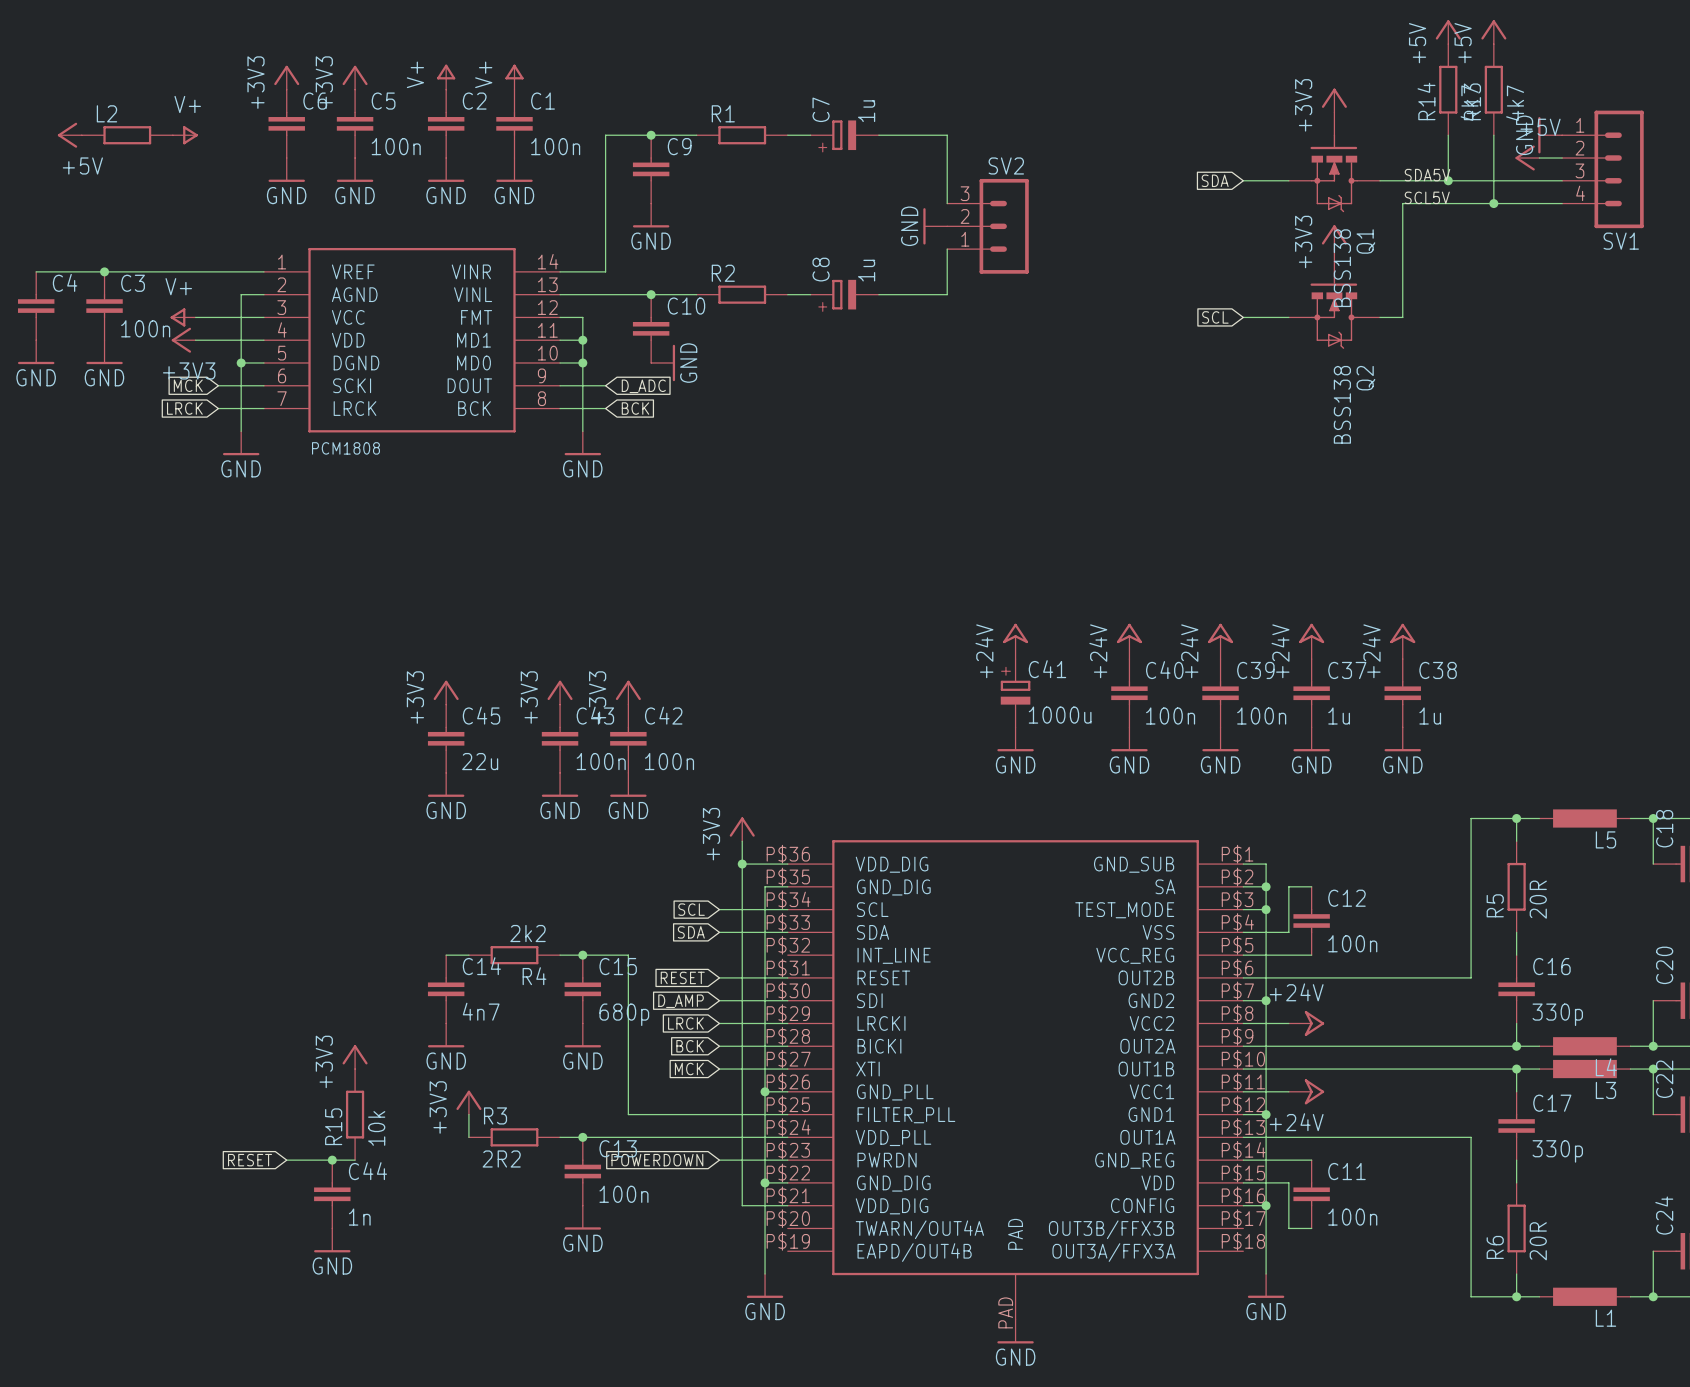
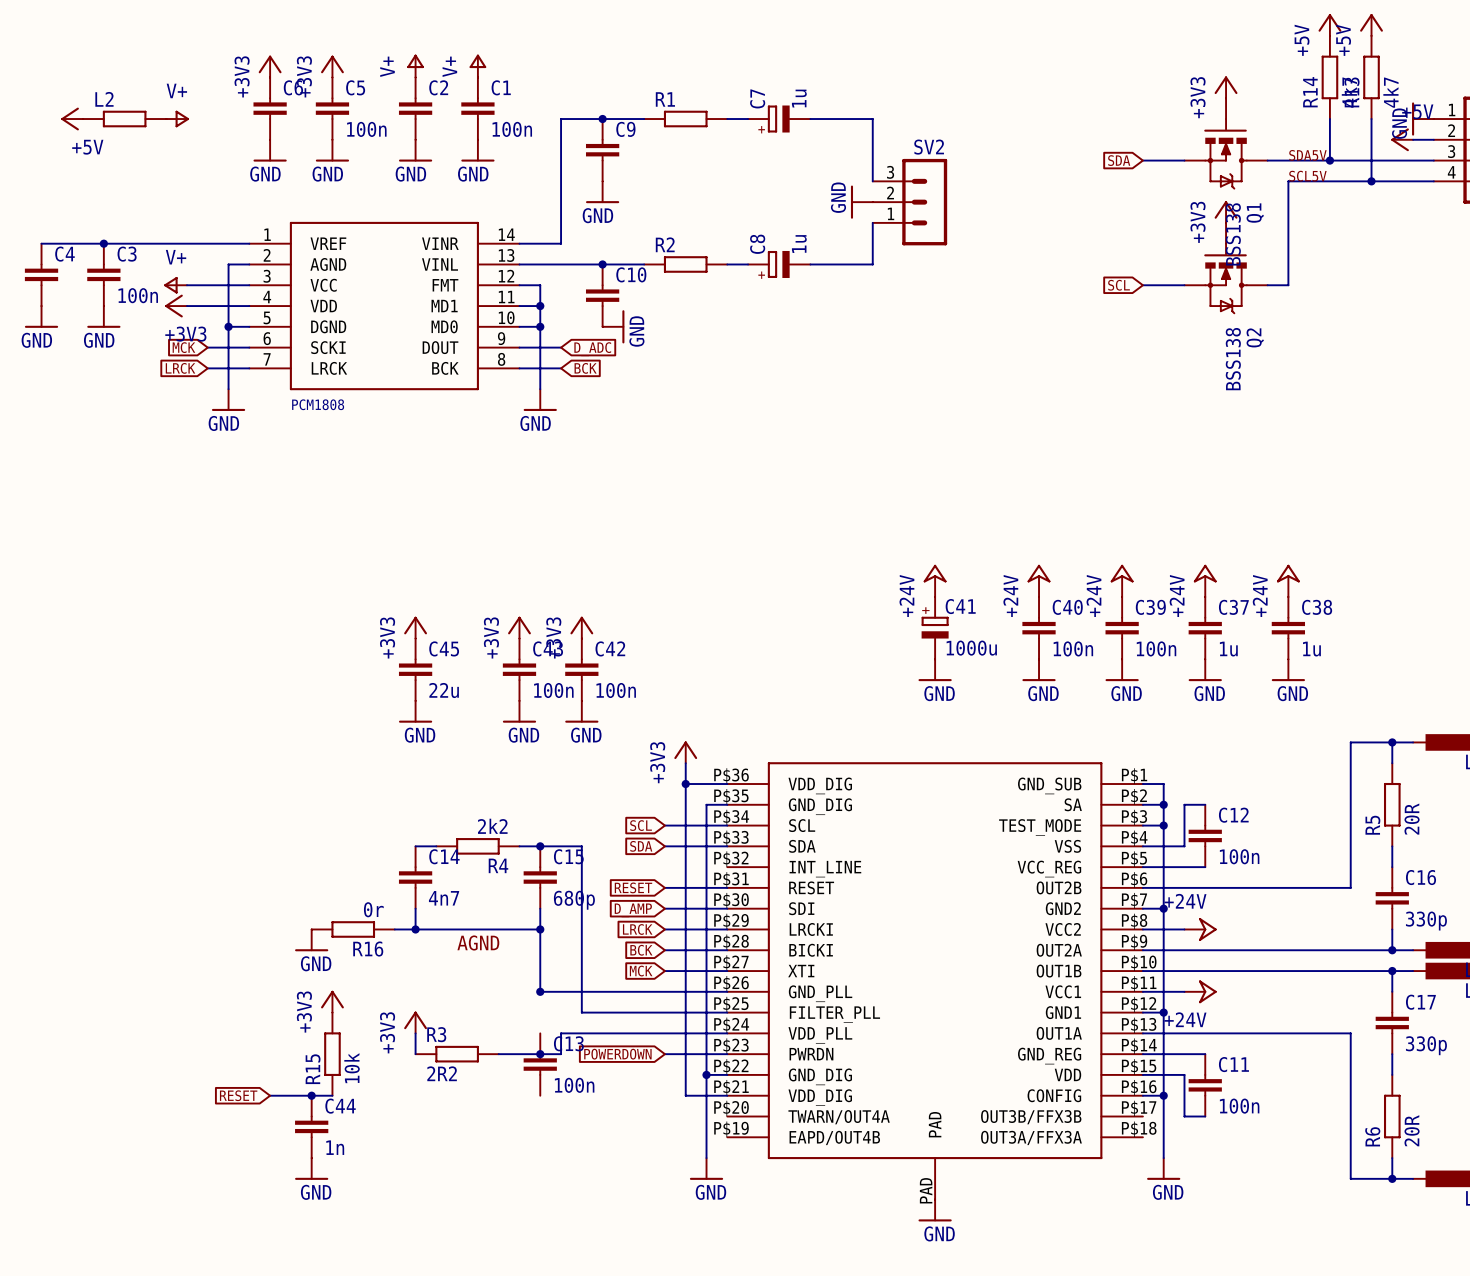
wire: (446, 955) (468, 955) -> (415, 846) (436, 846)
R4 position: (514, 955) -> (477, 846)
wire: (560, 955) (628, 955) -> (519, 846) (581, 846) (581, 867)
junction position: (582, 955) -> (540, 846)
C14 position: (446, 989) -> (415, 877)
C15 position: (582, 989) -> (540, 877)
wire: none -> (540, 908) (540, 991) (706, 991)
R16: none -> 0r (353, 929)
wire: none -> (394, 929) (540, 929)
junction: none -> (415, 929)
junction: none -> (540, 929)
power symbol: none -> GND (311, 940)
power symbol: GND (446, 1035) -> none
power symbol: GND (582, 1035) -> none
label: none -> AGND (478, 942)
power symbol position: +3V3 (355, 1057) -> +3V3 (332, 1001)
junction: none -> (540, 991)
junction: (765, 1091) -> none
power symbol position: +3V3 (468, 1102) -> +3V3 (415, 1022)
R15 position: (355, 1114) -> (332, 1054)
wire: (468, 1114) (468, 1137) -> (415, 1033) (415, 1054)
R3 position: (514, 1137) -> (457, 1054)
wire: (560, 1137) (605, 1137) -> (498, 1054) (561, 1054) (561, 1033)
junction: (582, 1137) -> none
global label position: RESET (250, 1160) -> RESET (238, 1095)
wire: (286, 1160) (355, 1160) -> (270, 1095) (332, 1095)
junction position: (332, 1160) -> (311, 1095)
junction: none -> (540, 1054)
C44 position: (332, 1194) -> (311, 1126)
power symbol: GND (582, 1217) -> none
power symbol position: GND (332, 1240) -> GND (311, 1168)

